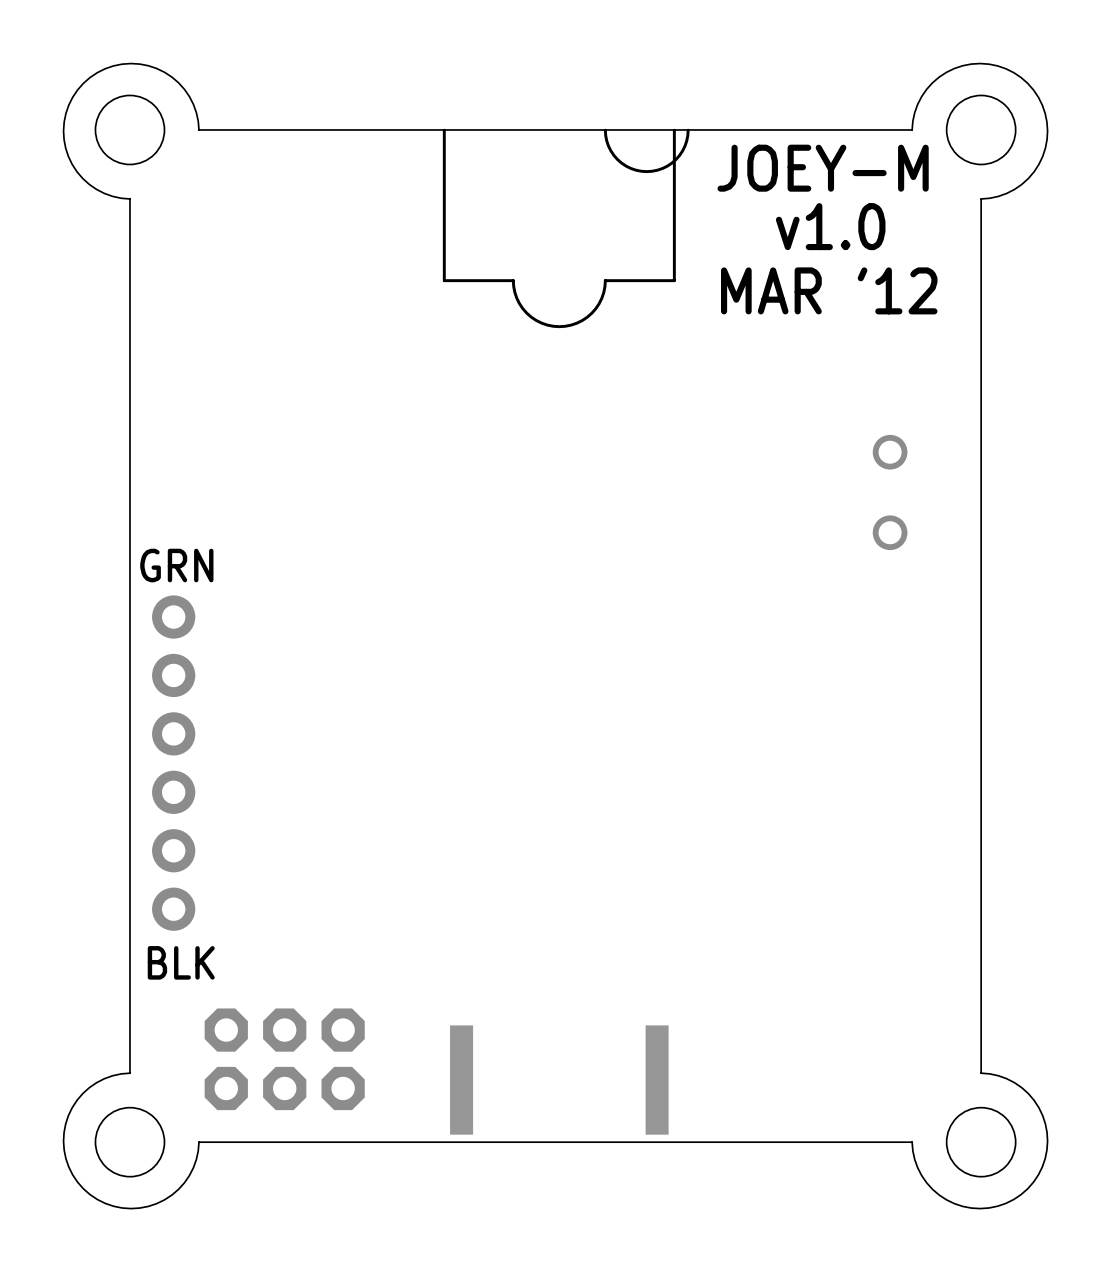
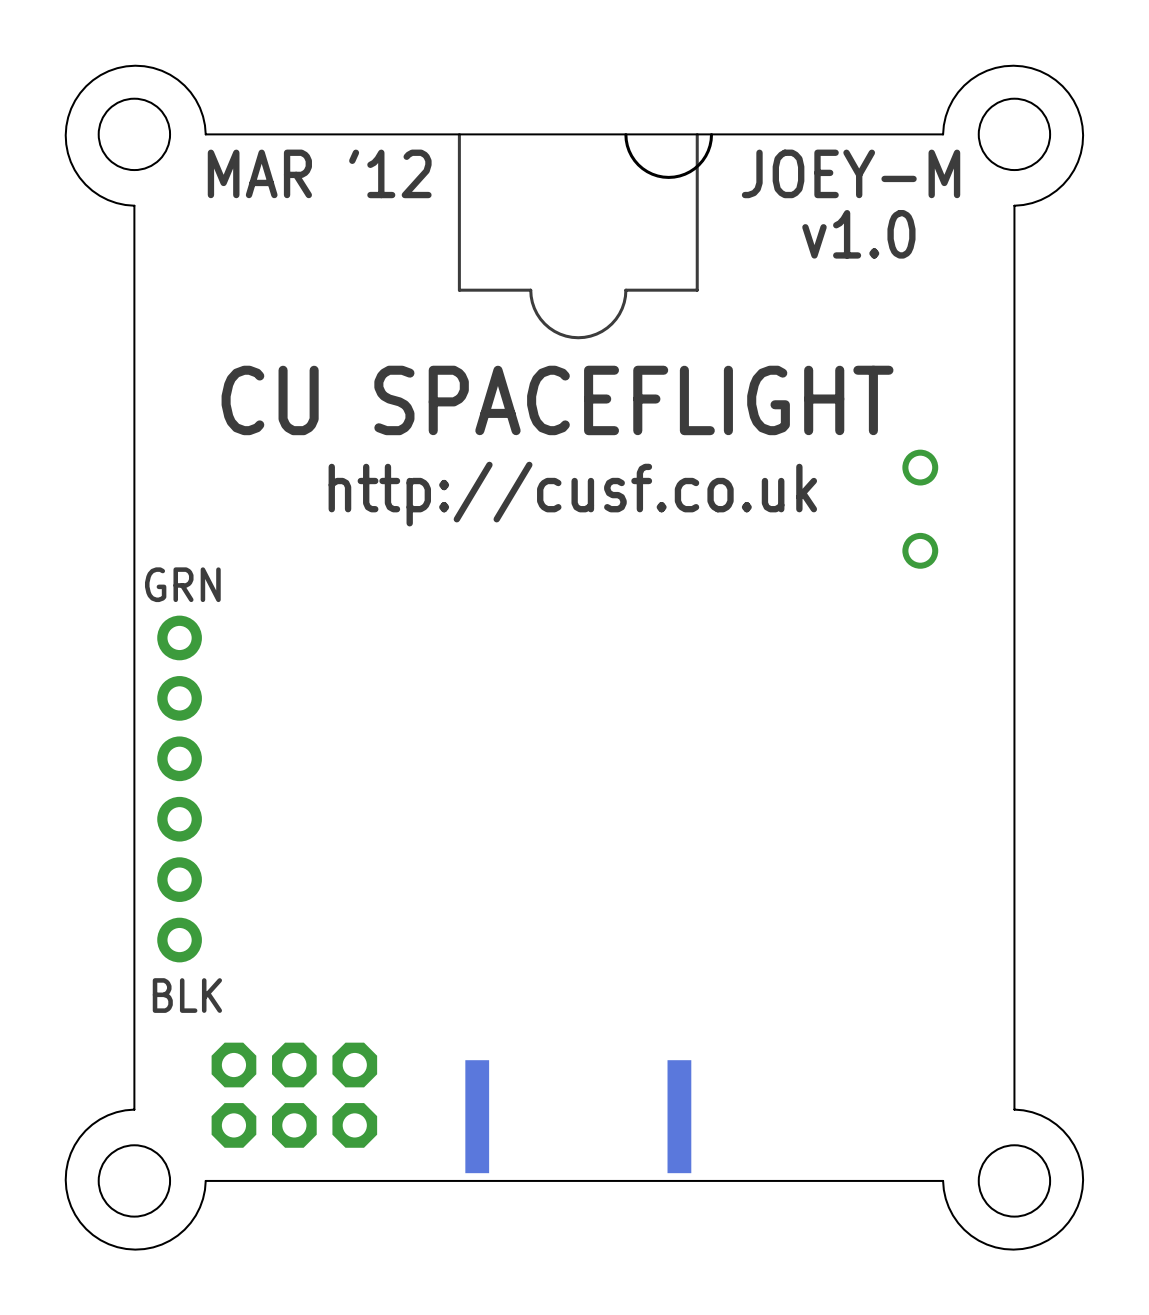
text position: MAR '12 (829, 290) -> MAR '12 (319, 173)
text: none -> CU SPACEFLIGHT (557, 400)
text: none -> http://cusf.co.uk (572, 494)

